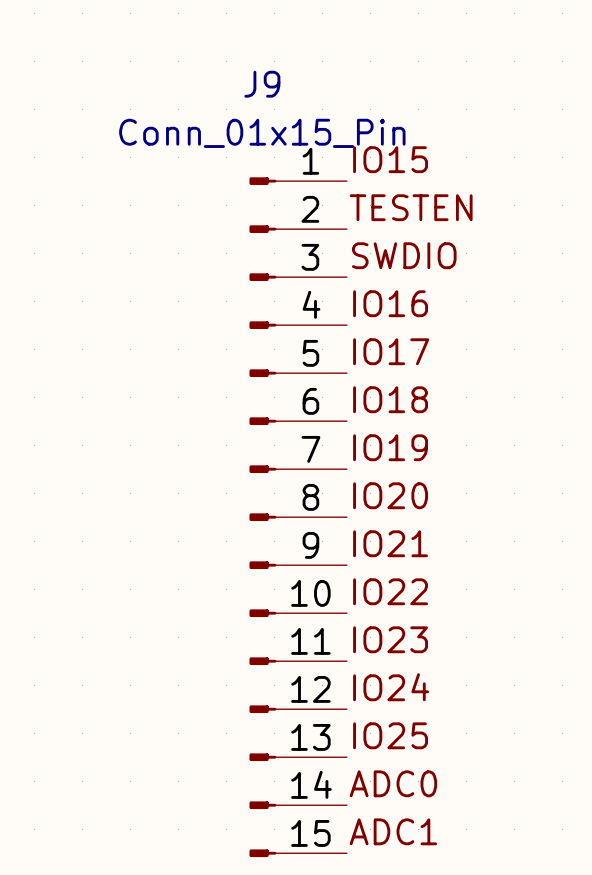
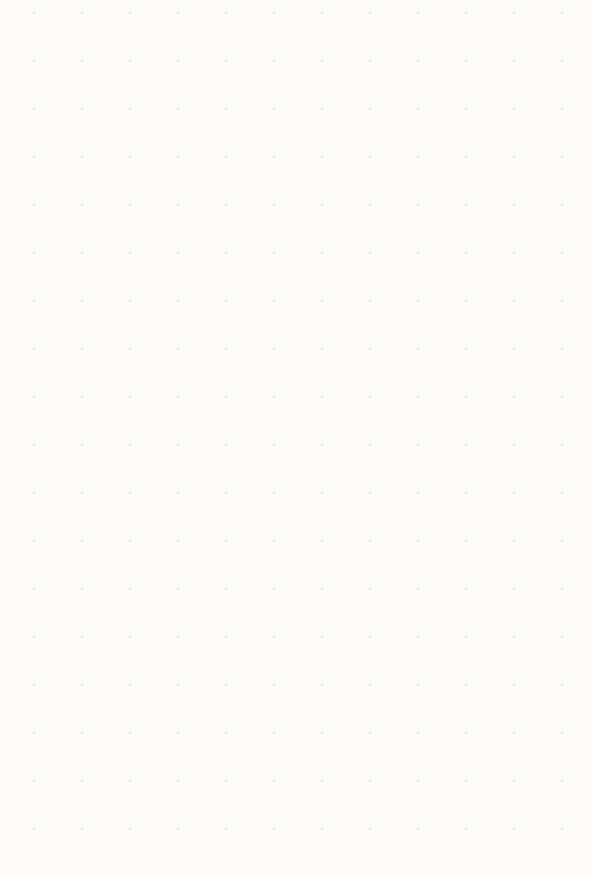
label: IO15 (390, 159) -> none
label: TESTEN (411, 207) -> none
label: SWDIO (404, 255) -> none
label: IO16 (390, 303) -> none
label: IO17 (391, 351) -> none
label: IO18 (390, 399) -> none
label: IO19 (390, 447) -> none
label: IO20 (390, 495) -> none
J9: Conn_01x15_Pin (298, 517) -> none
label: IO21 (390, 543) -> none
label: IO22 (390, 591) -> none
label: IO23 (390, 639) -> none
label: IO24 (391, 687) -> none
label: IO25 (390, 735) -> none
label: ADC0 (393, 783) -> none
label: ADC1 (393, 831) -> none

